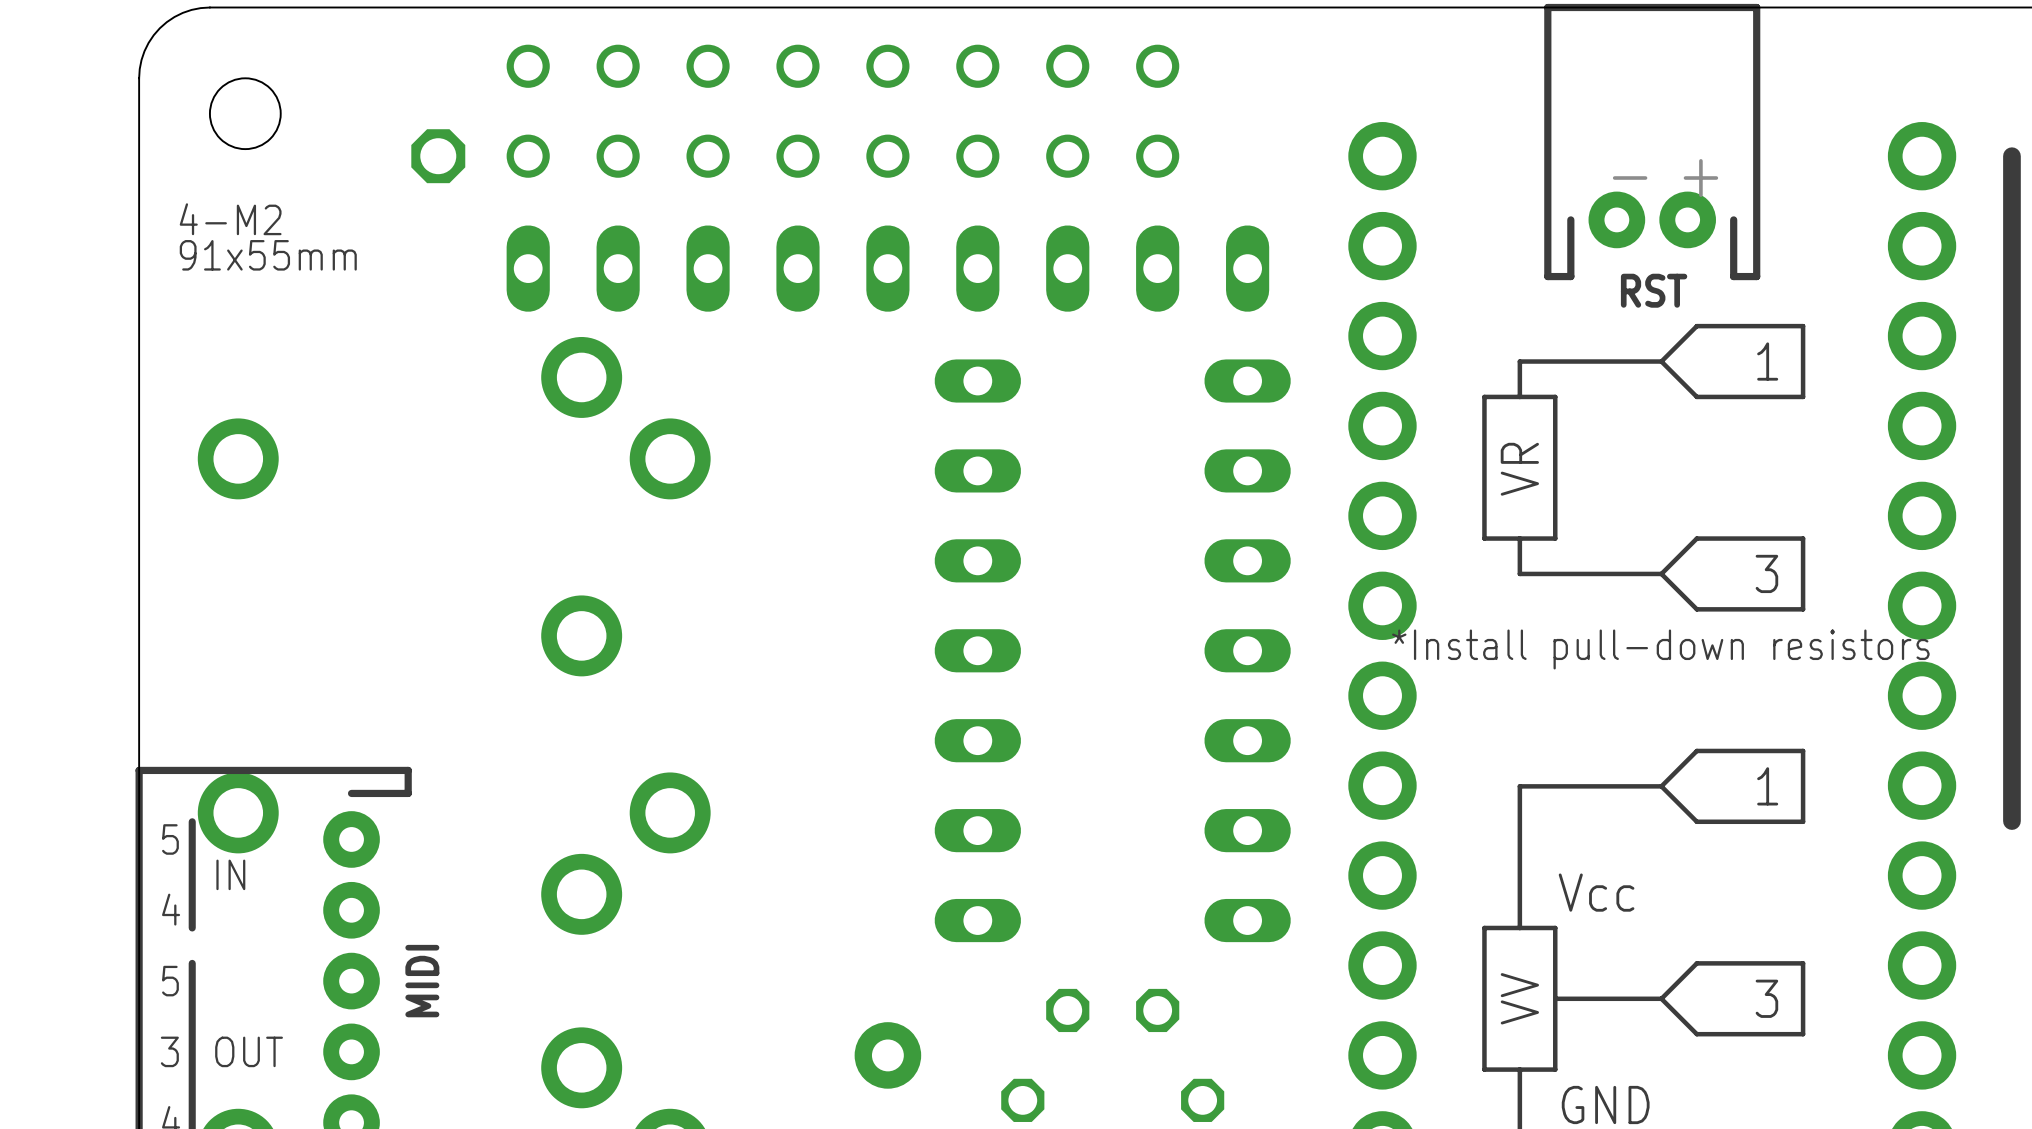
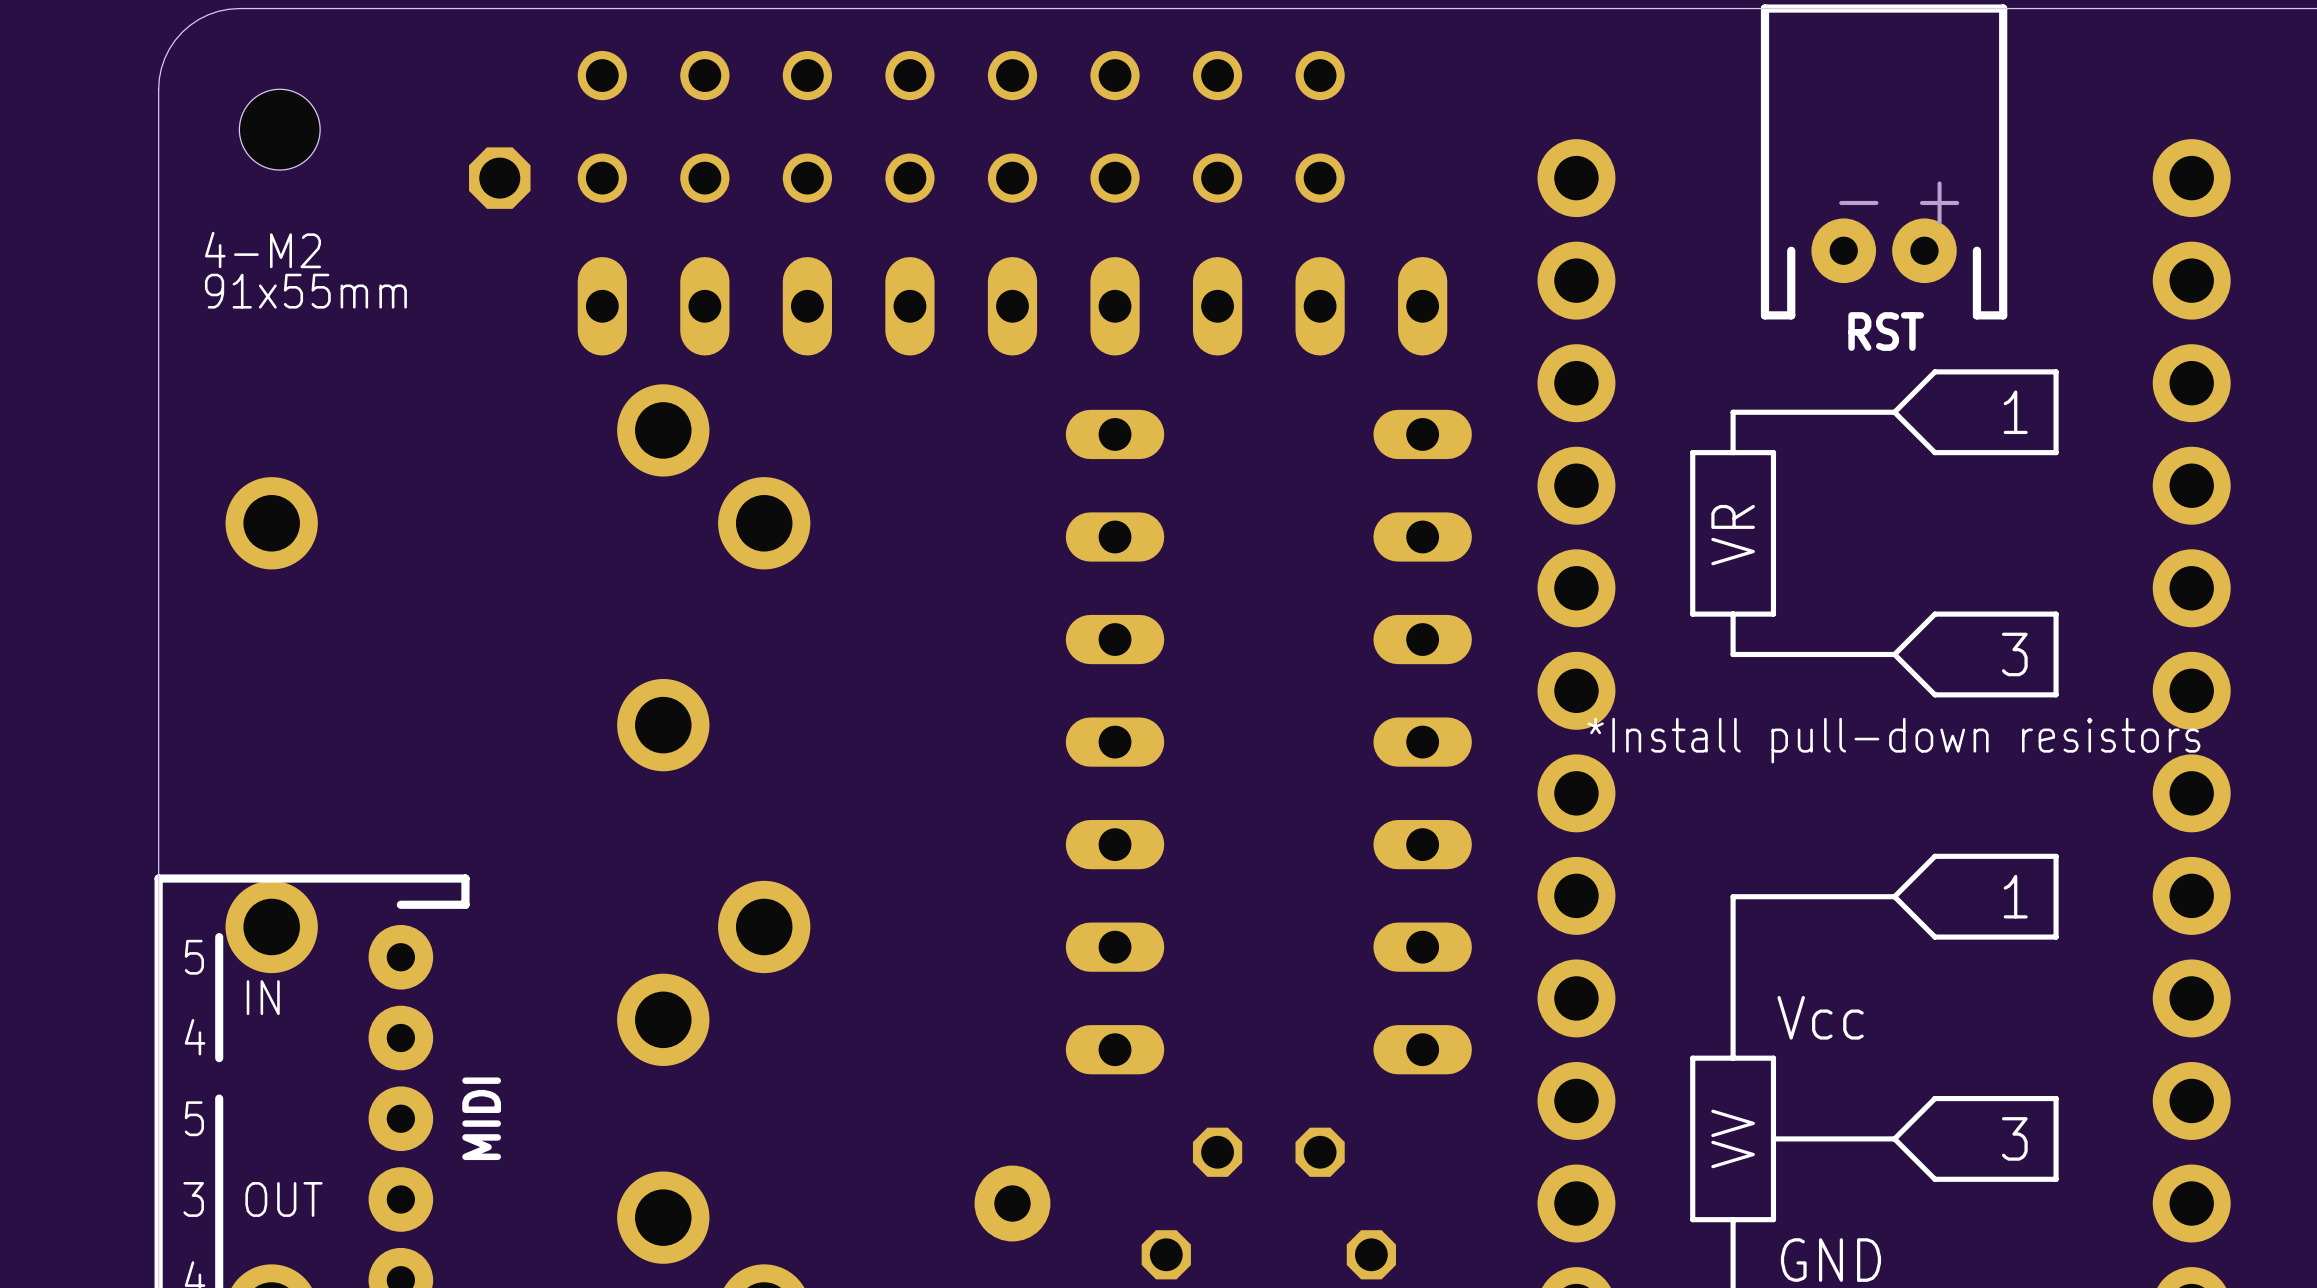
line: (2011, 156) (2011, 821) -> none

